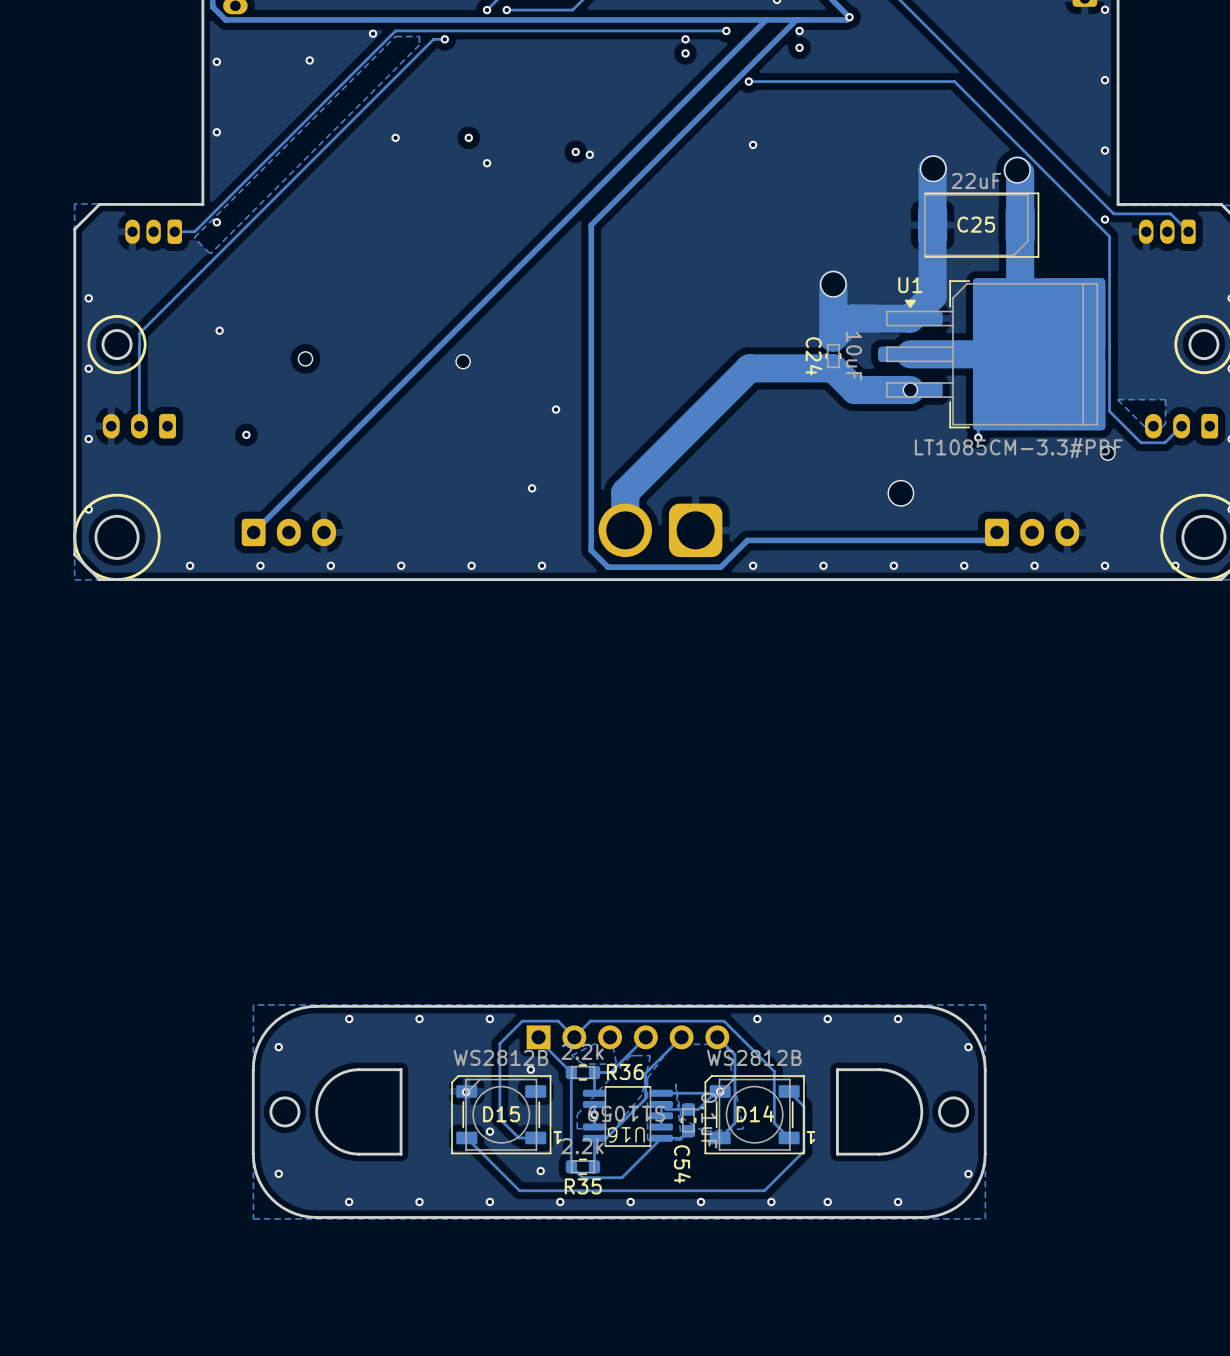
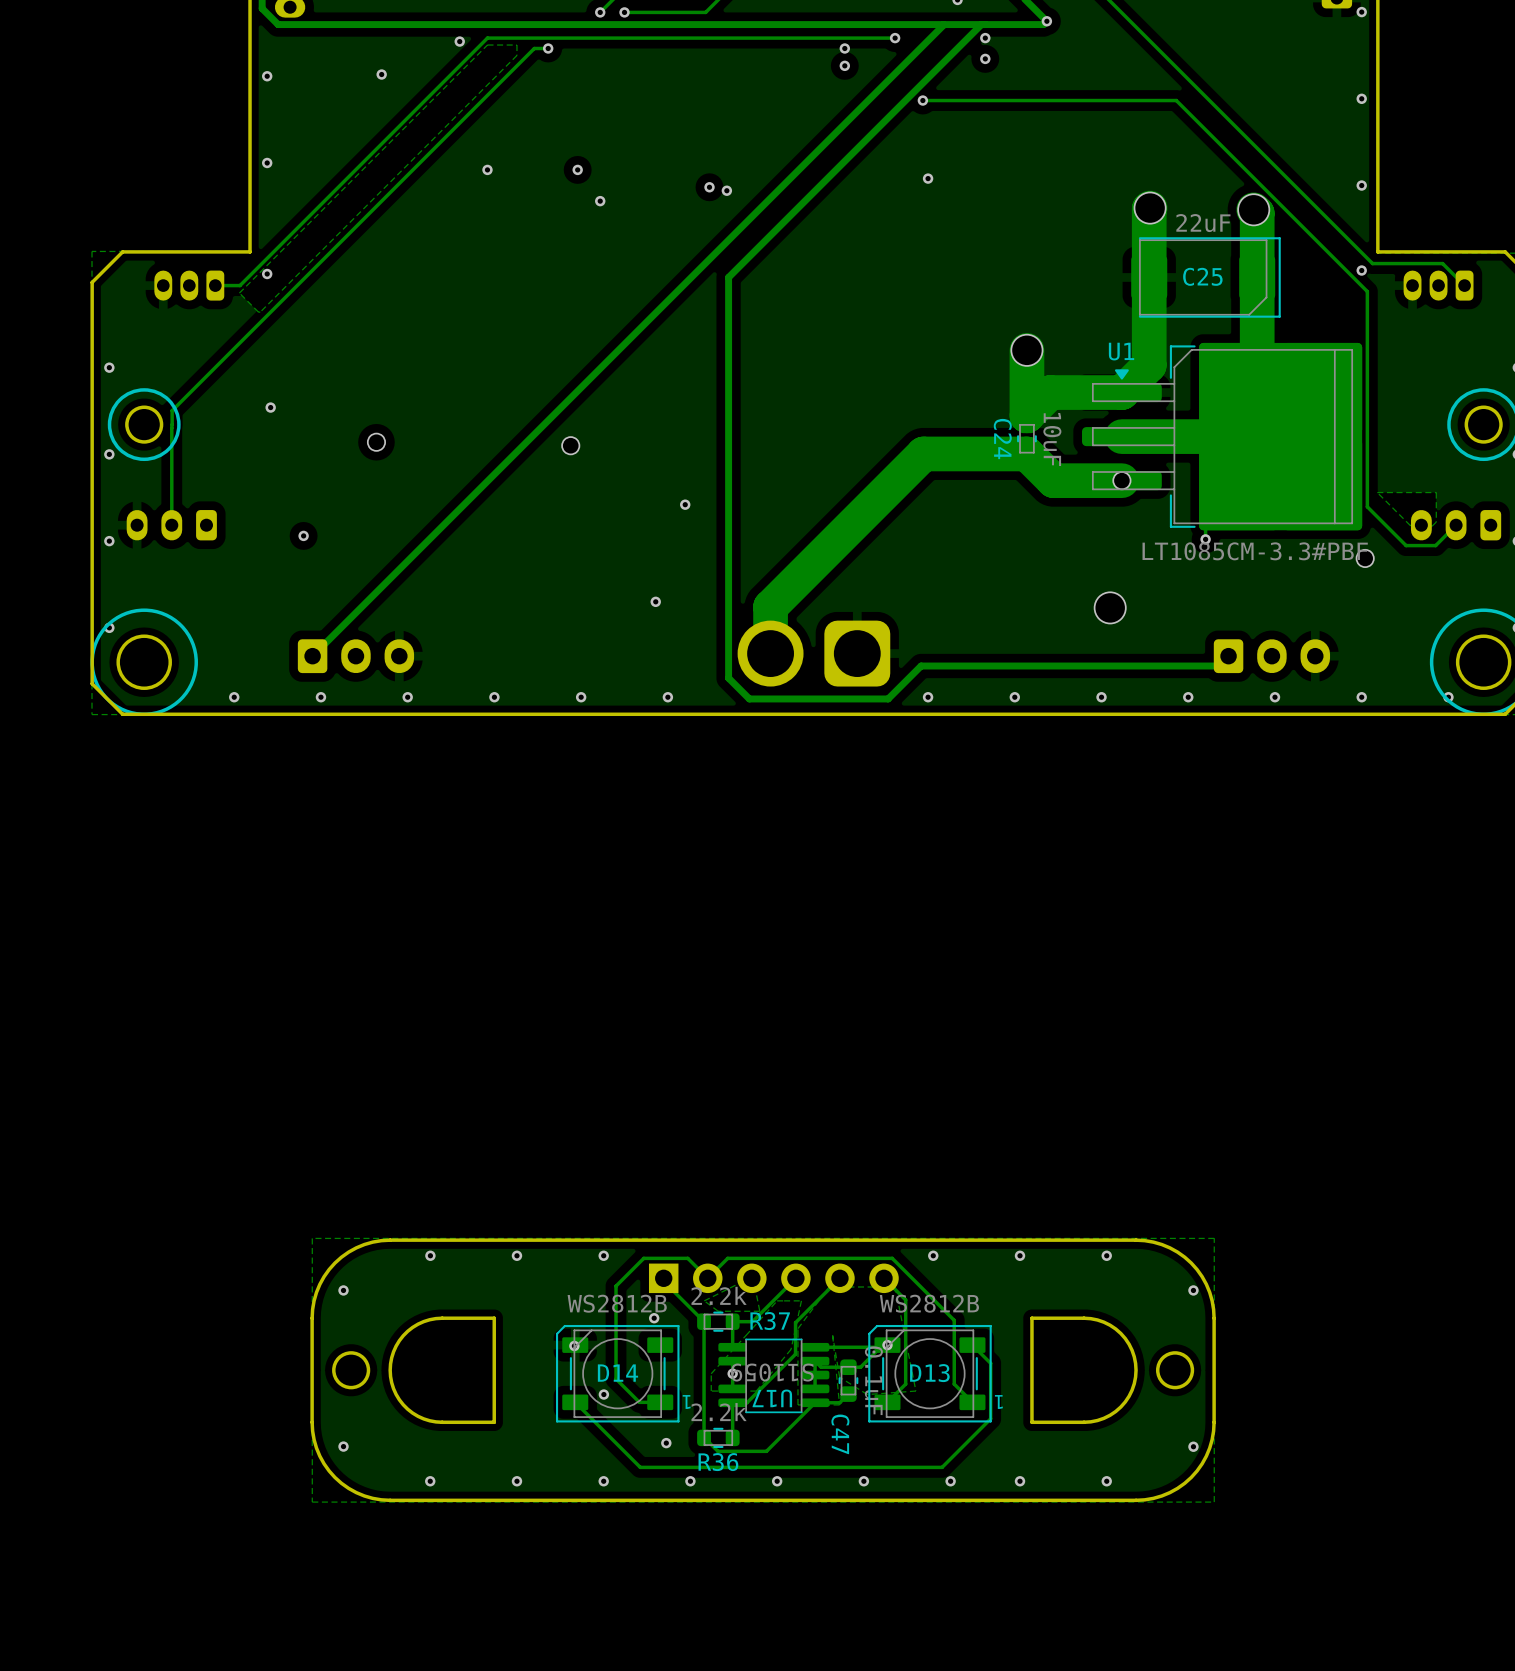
R36 name: R36 (625, 1071) -> R37 (770, 1321)
D14 name: D14 (755, 1113) -> D13 (929, 1373)
D15 name: D15 (501, 1114) -> D14 (617, 1373)
U16 name: U16 (626, 1134) -> U17 (772, 1398)
C54 name: C54 (682, 1164) -> C47 (840, 1434)
R35 name: R35 (583, 1186) -> R36 (718, 1462)

